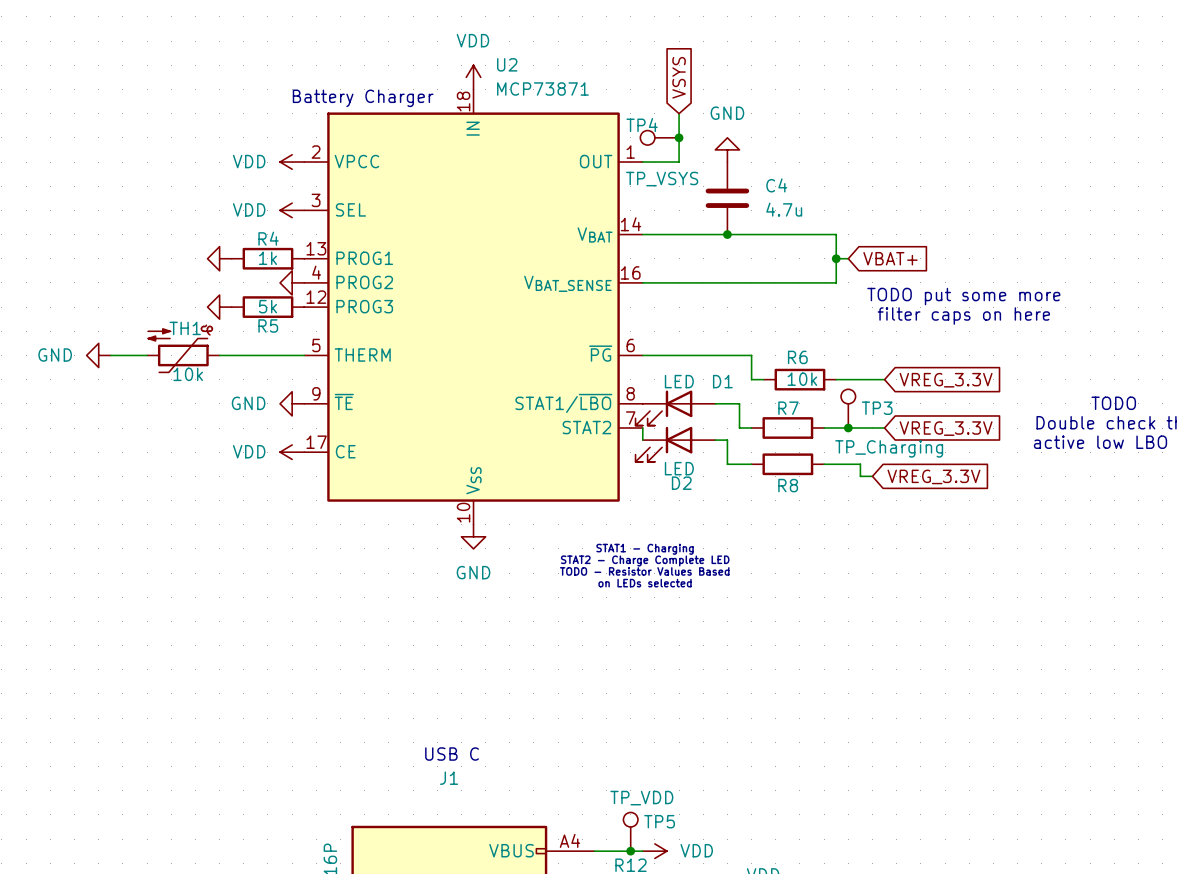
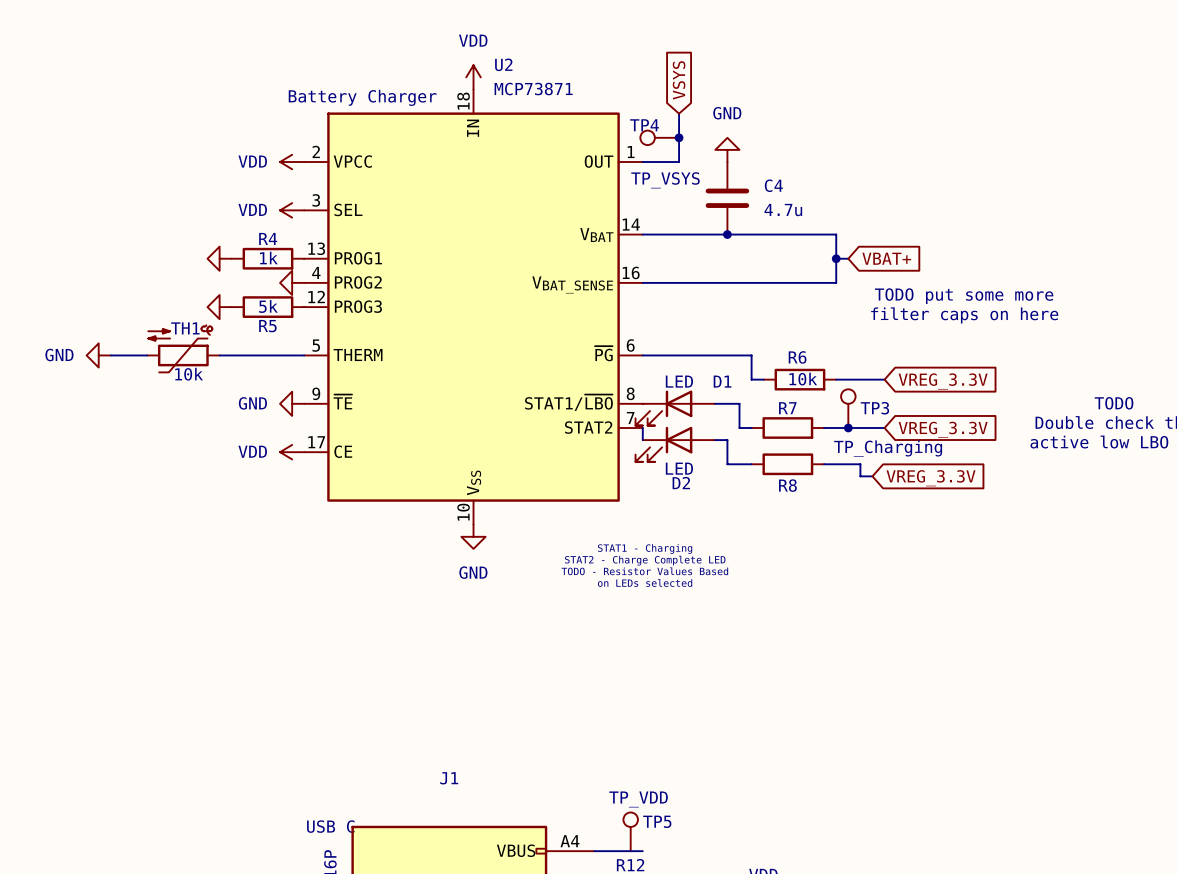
text position: USB C (452, 754) -> USB C (330, 826)
junction: (630, 851) -> none
power symbol: VDD (654, 851) -> none

